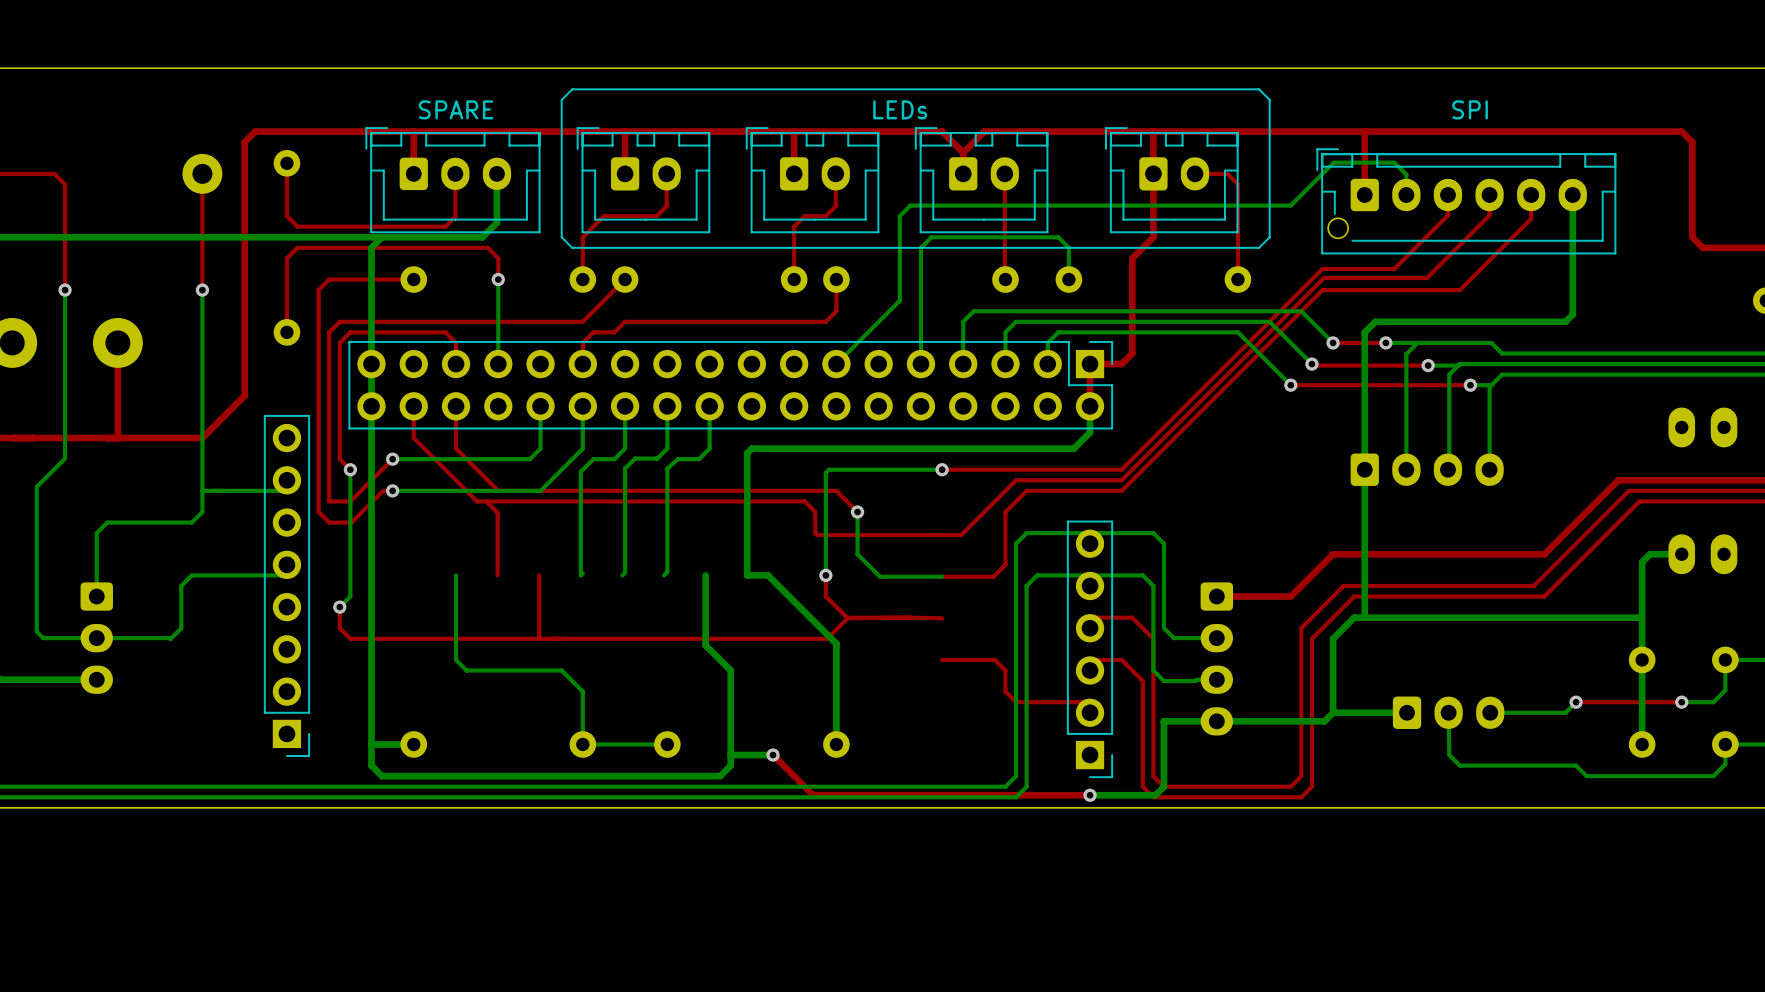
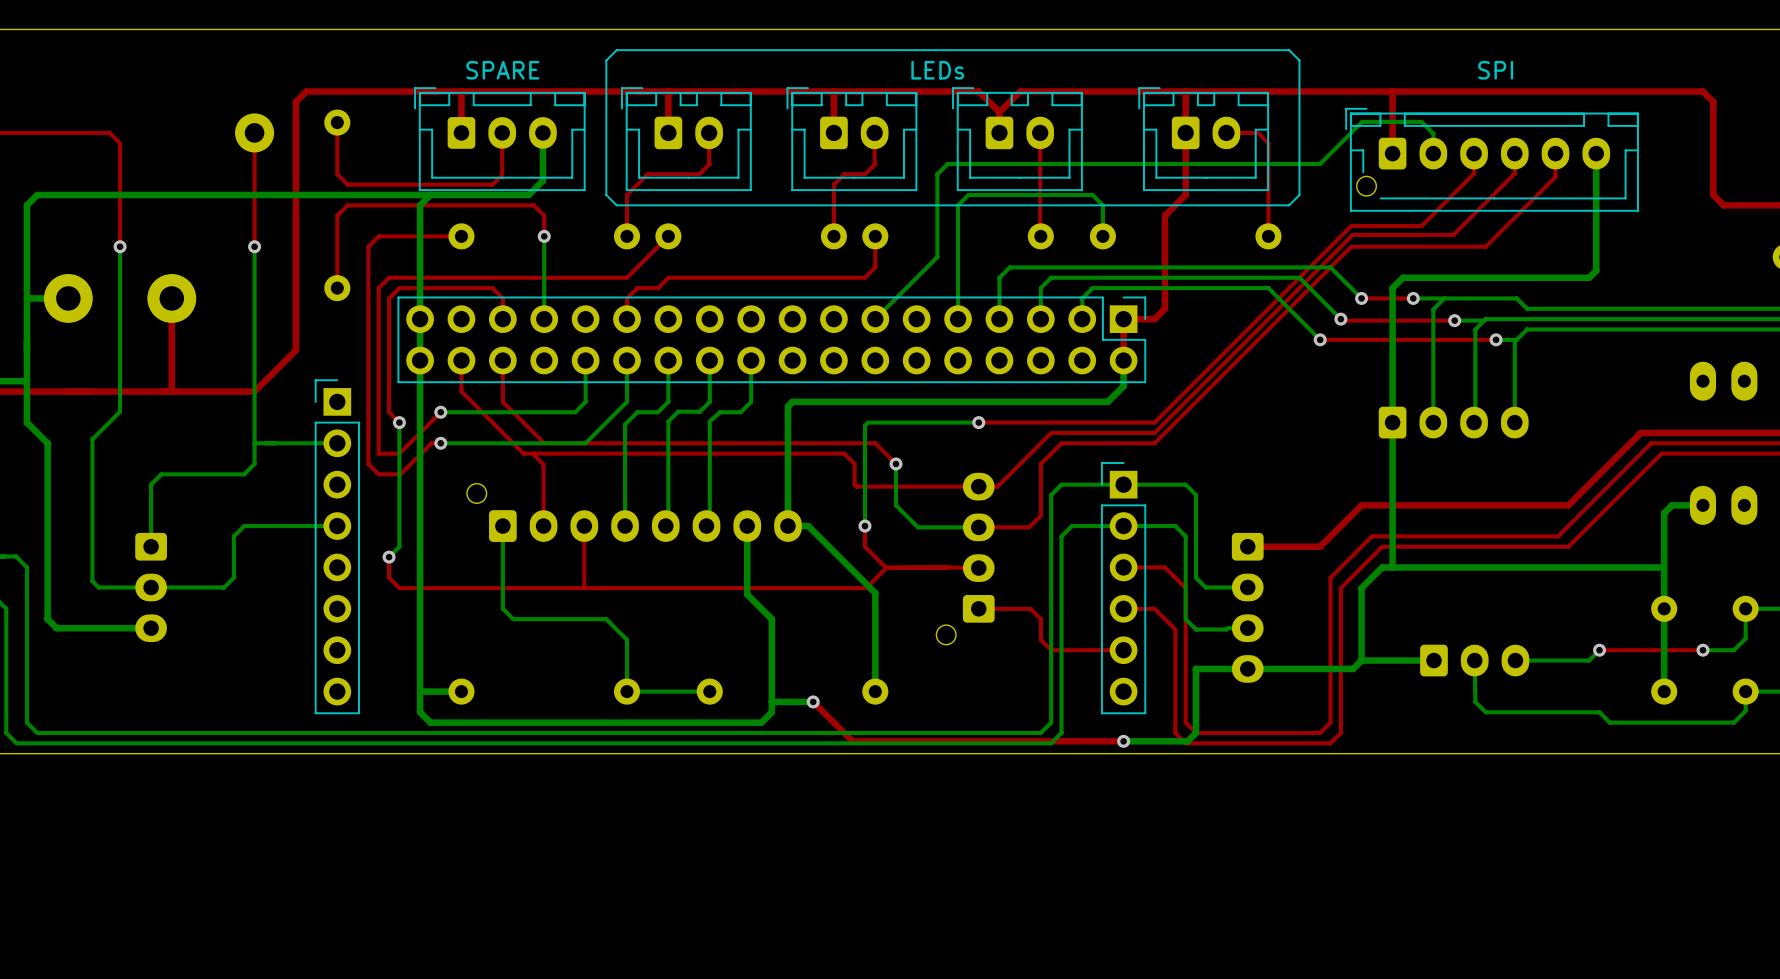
part: none -> (634, 512)
part rotation: 0° (286, 585) -> 180° (337, 546)
part: none -> (965, 558)
part rotation: 0° (1090, 649) -> 180° (1123, 588)

